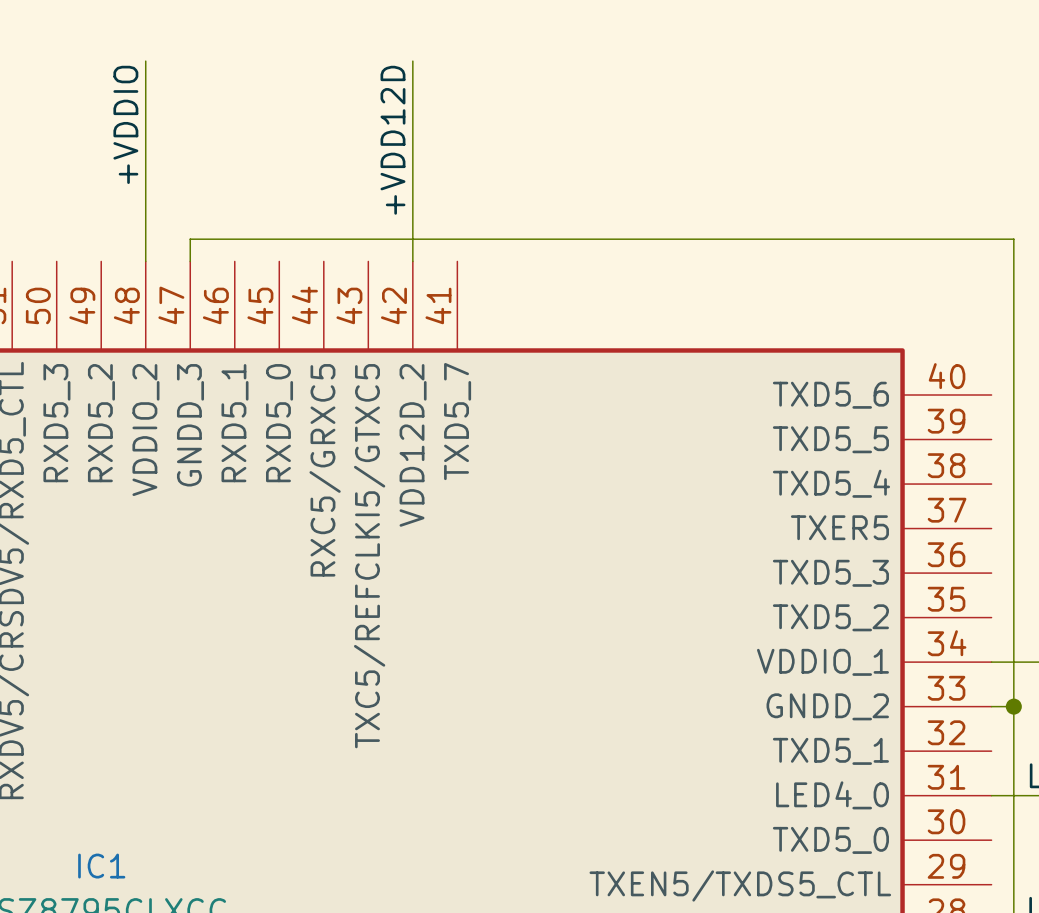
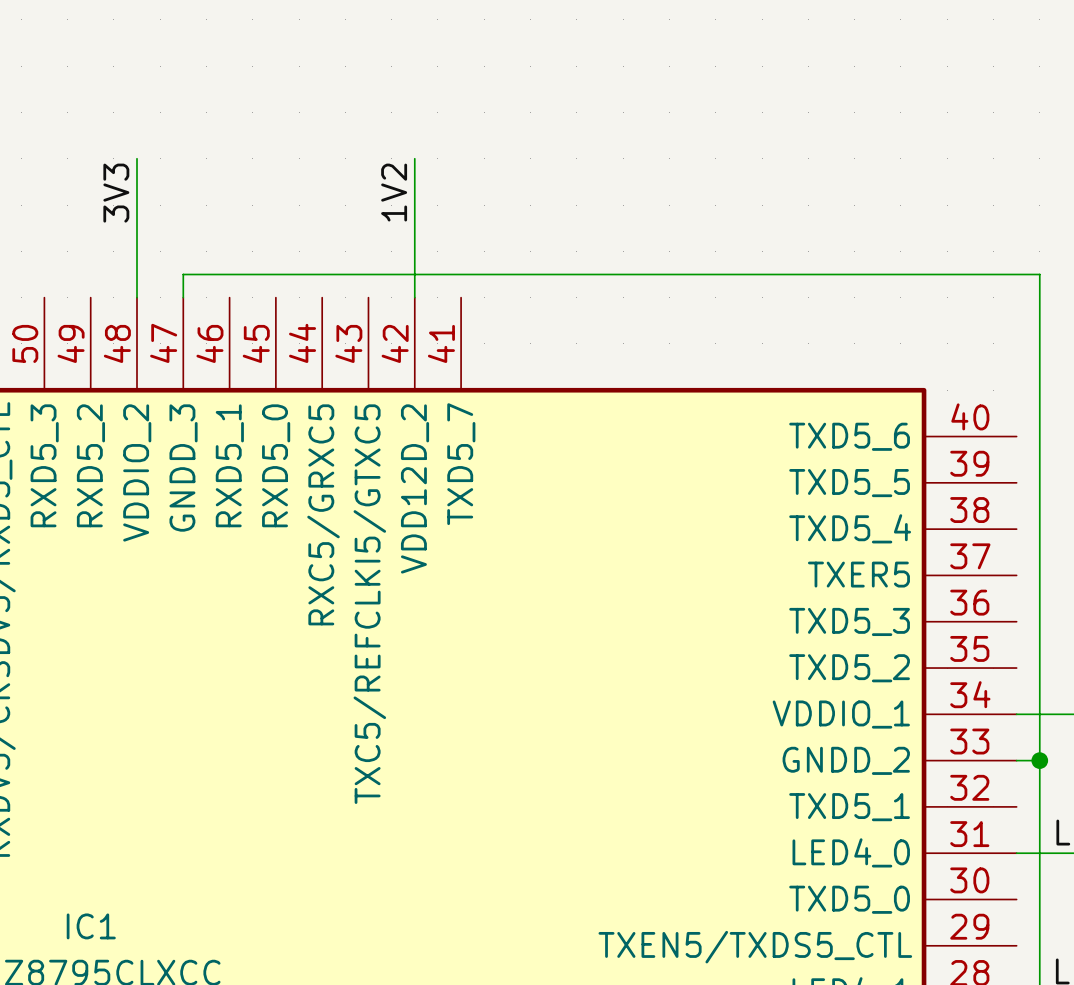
wire: (145, 61) (145, 127) -> none
wire: (412, 61) (412, 127) -> none
label: +VDDIO (125, 124) -> none
label: +VDD12D (392, 140) -> none
label: none -> 3V3 (116, 193)
label: none -> 1V2 (394, 192)

